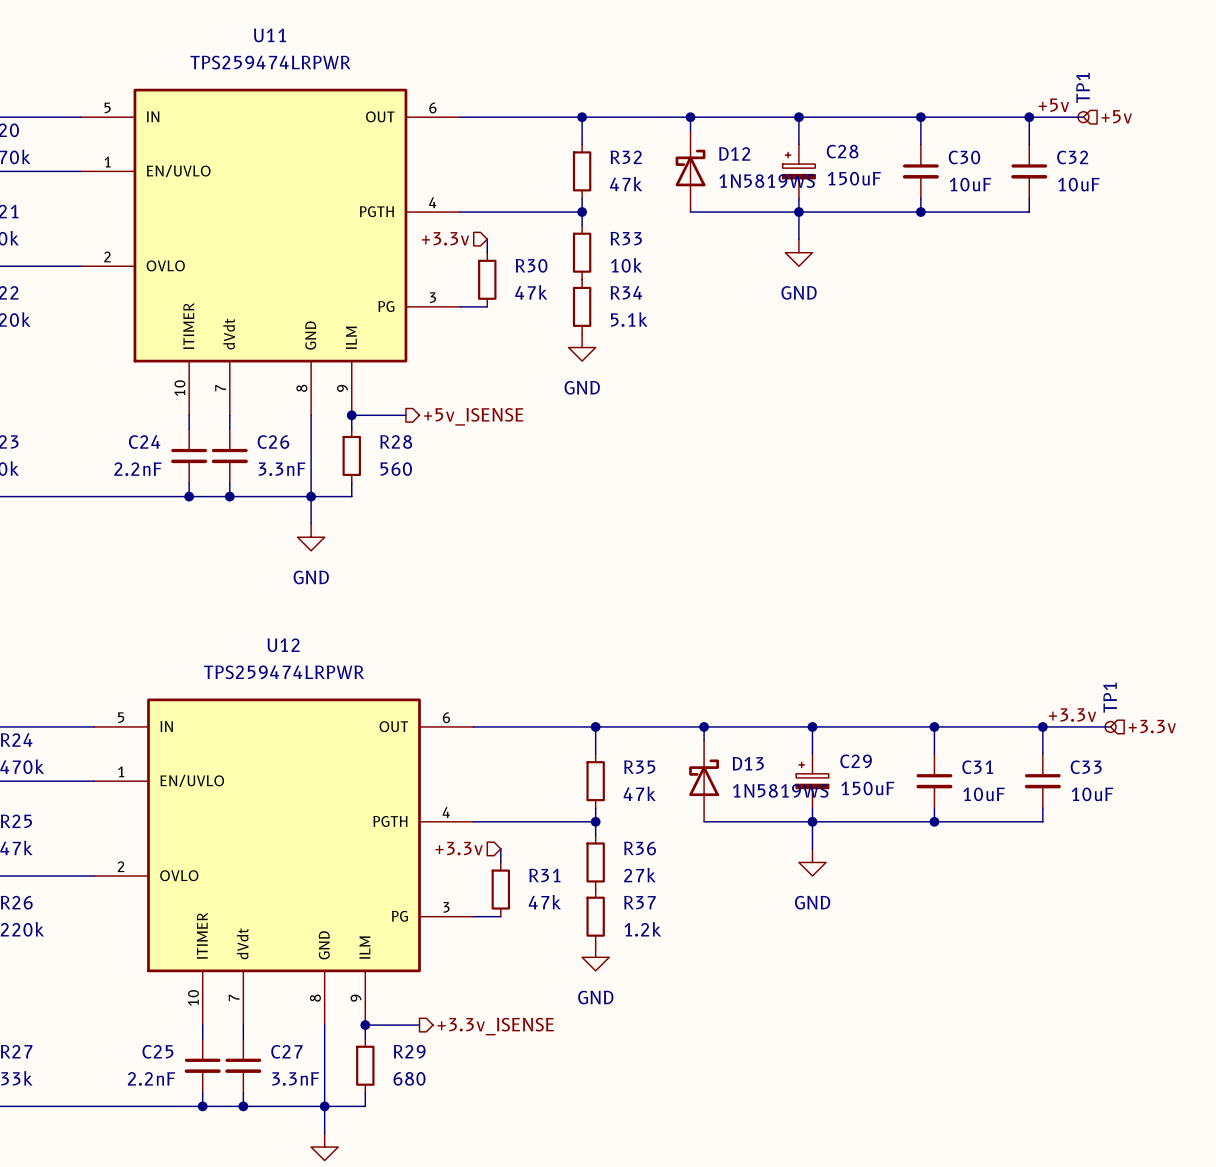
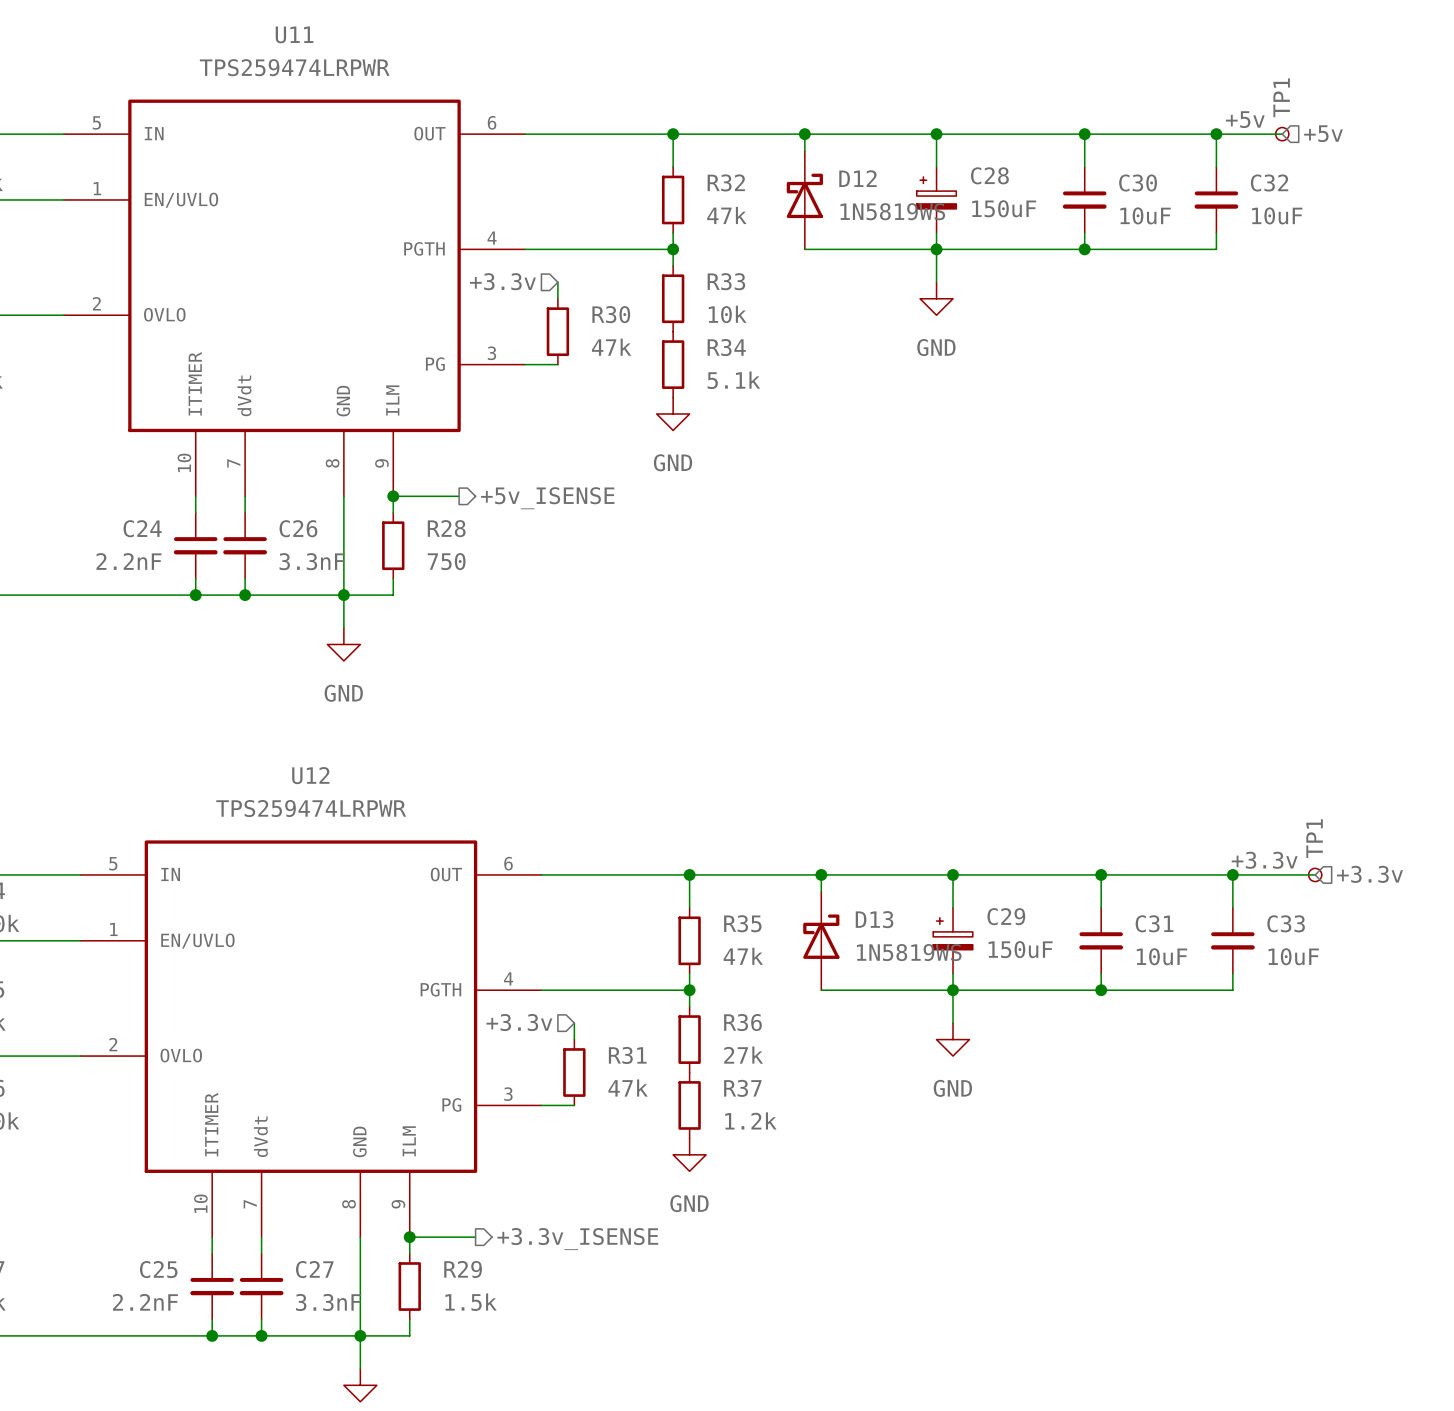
R28 value: 560 (396, 469) -> 750 (446, 561)
R29 value: 680 (409, 1078) -> 1.5k (471, 1302)

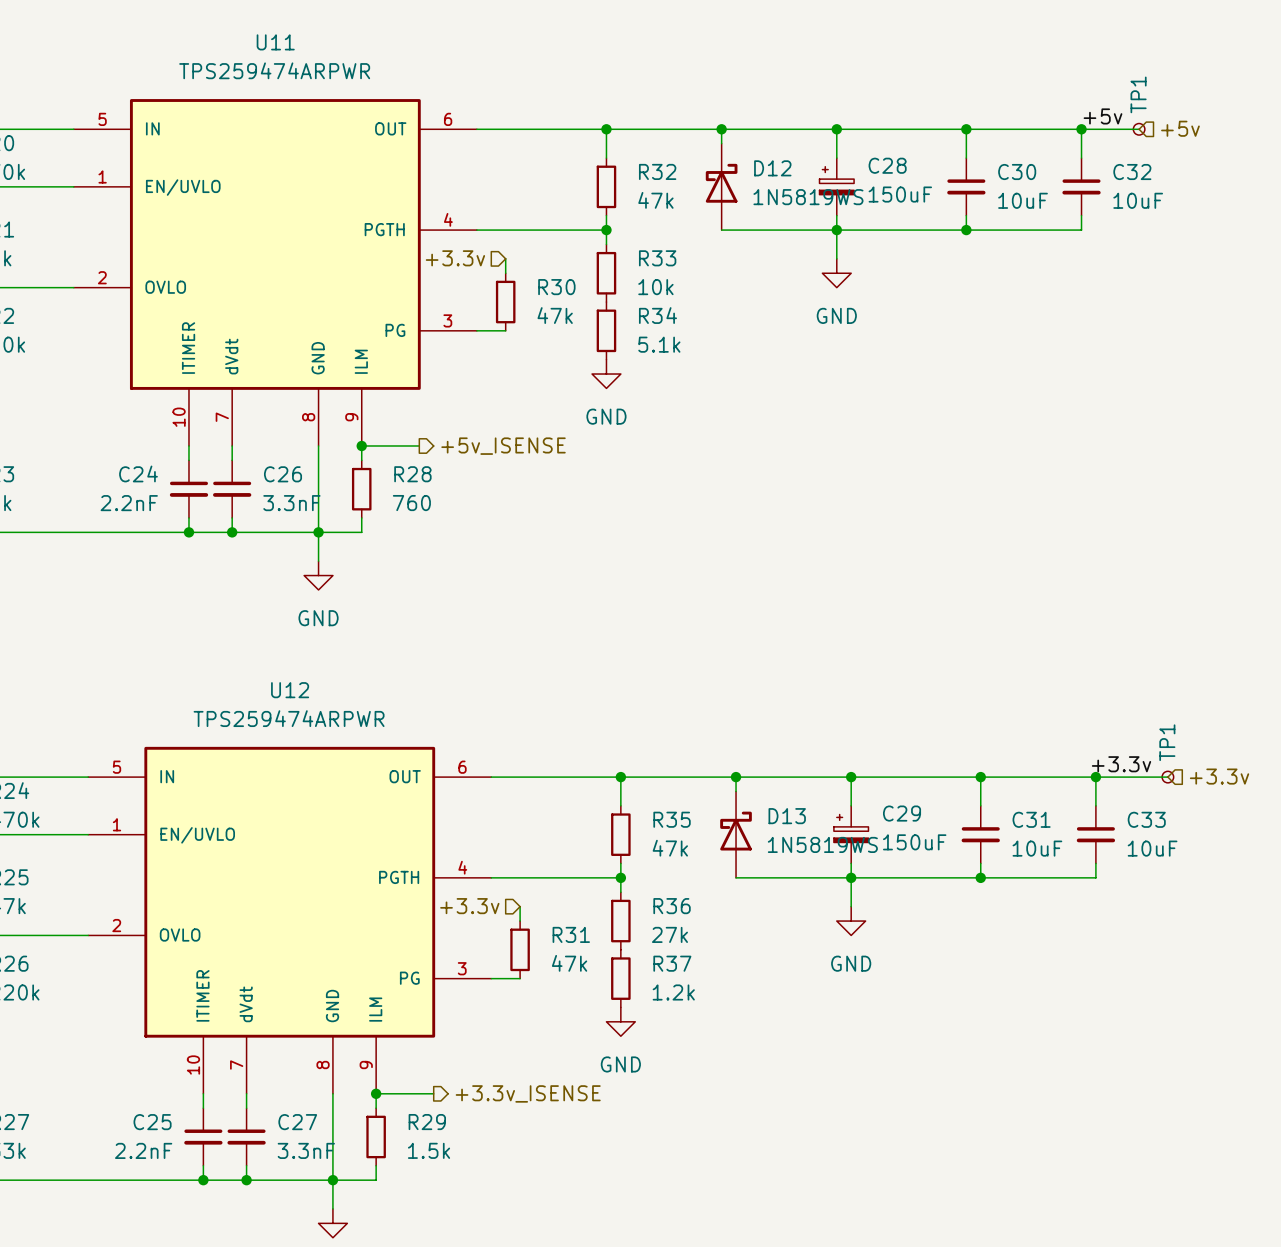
U11 value: TPS259474LRPWR (294, 67) -> TPS259474ARPWR (274, 70)
R28 value: 750 (446, 561) -> 760 (411, 503)
U12 value: TPS259474LRPWR (311, 808) -> TPS259474ARPWR (289, 718)

